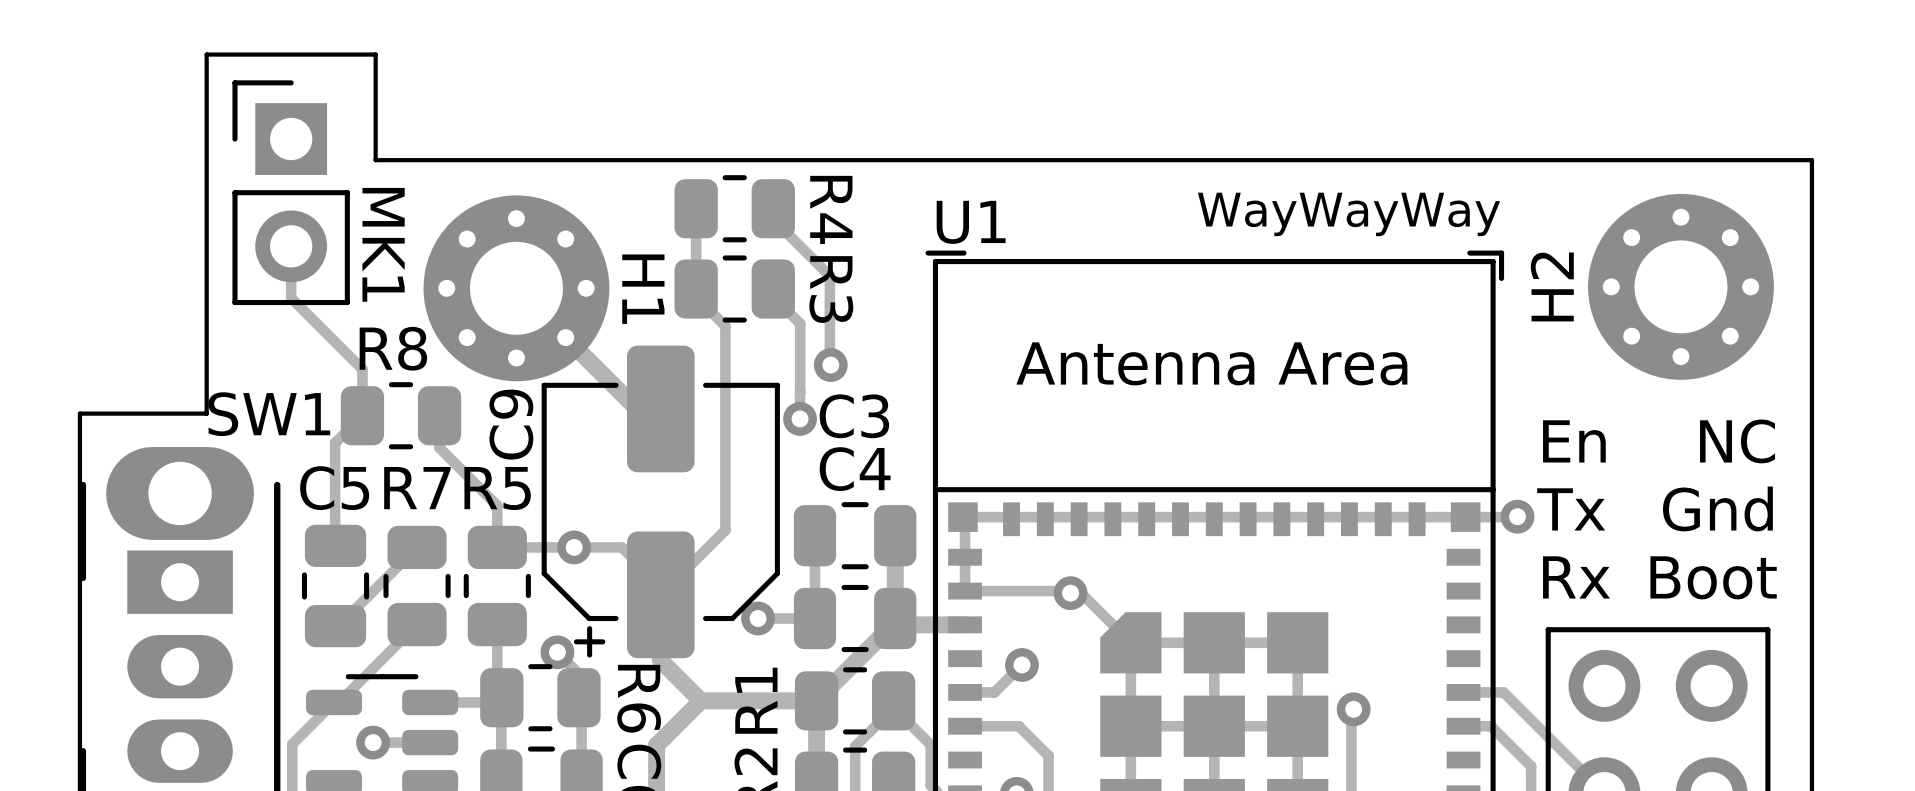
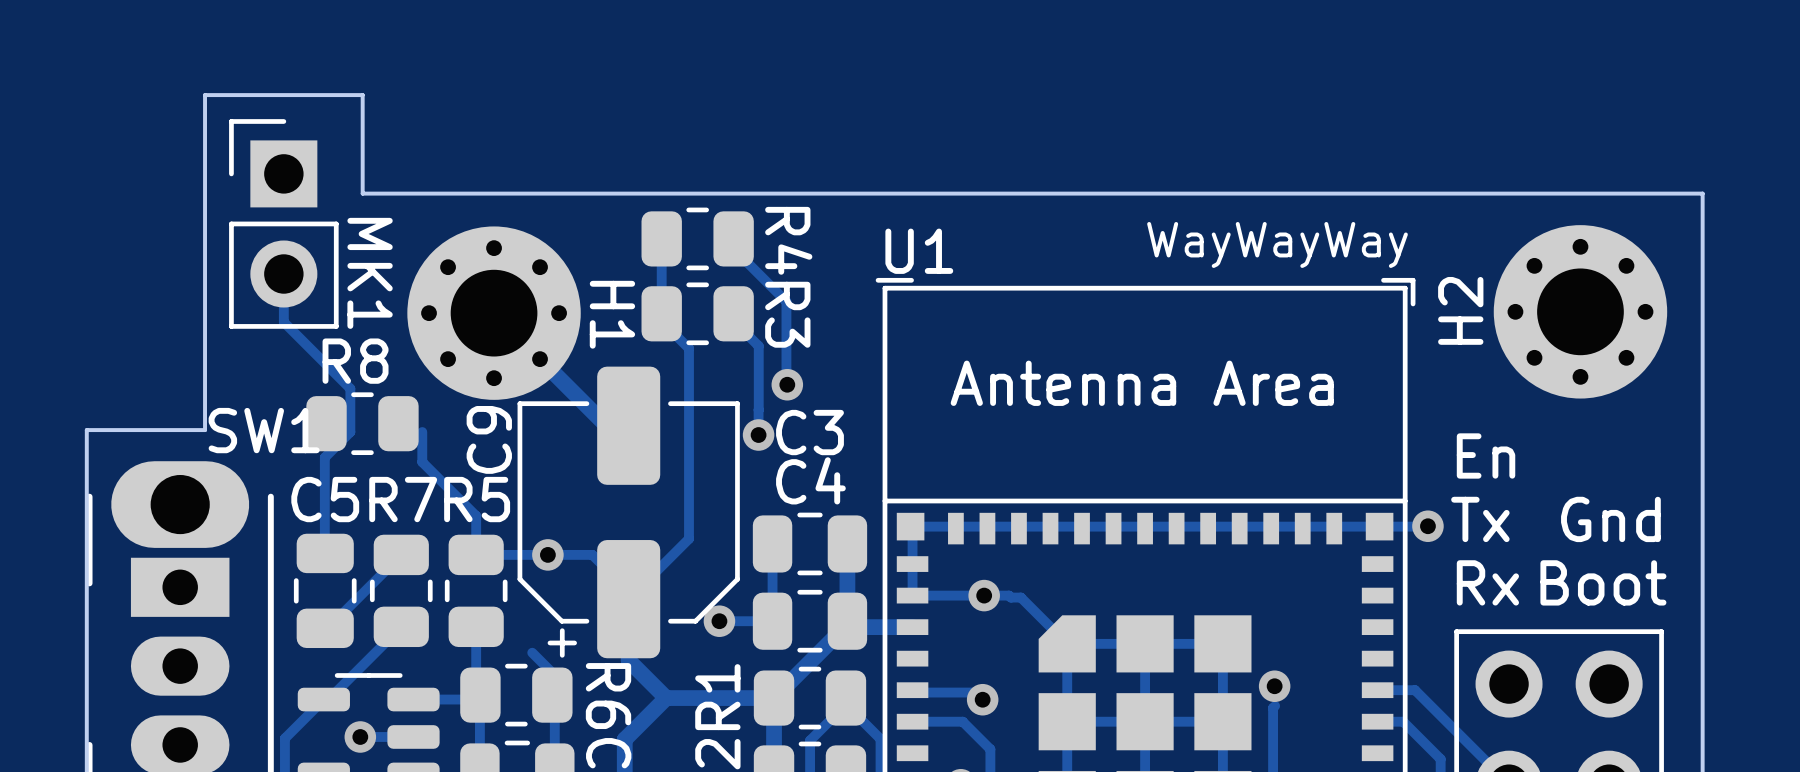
R8 position: (401, 415) -> (362, 423)
text: NC (1737, 441) -> none
via position: (1070, 593) -> (984, 595)
via: (557, 652) -> none
track: (1021, 664) (994, 692) (965, 692) -> (982, 699) (975, 692) (914, 692) (912, 690)
via: (1021, 664) -> none
via: none -> (982, 699)
via position: (1353, 709) -> (1274, 686)

